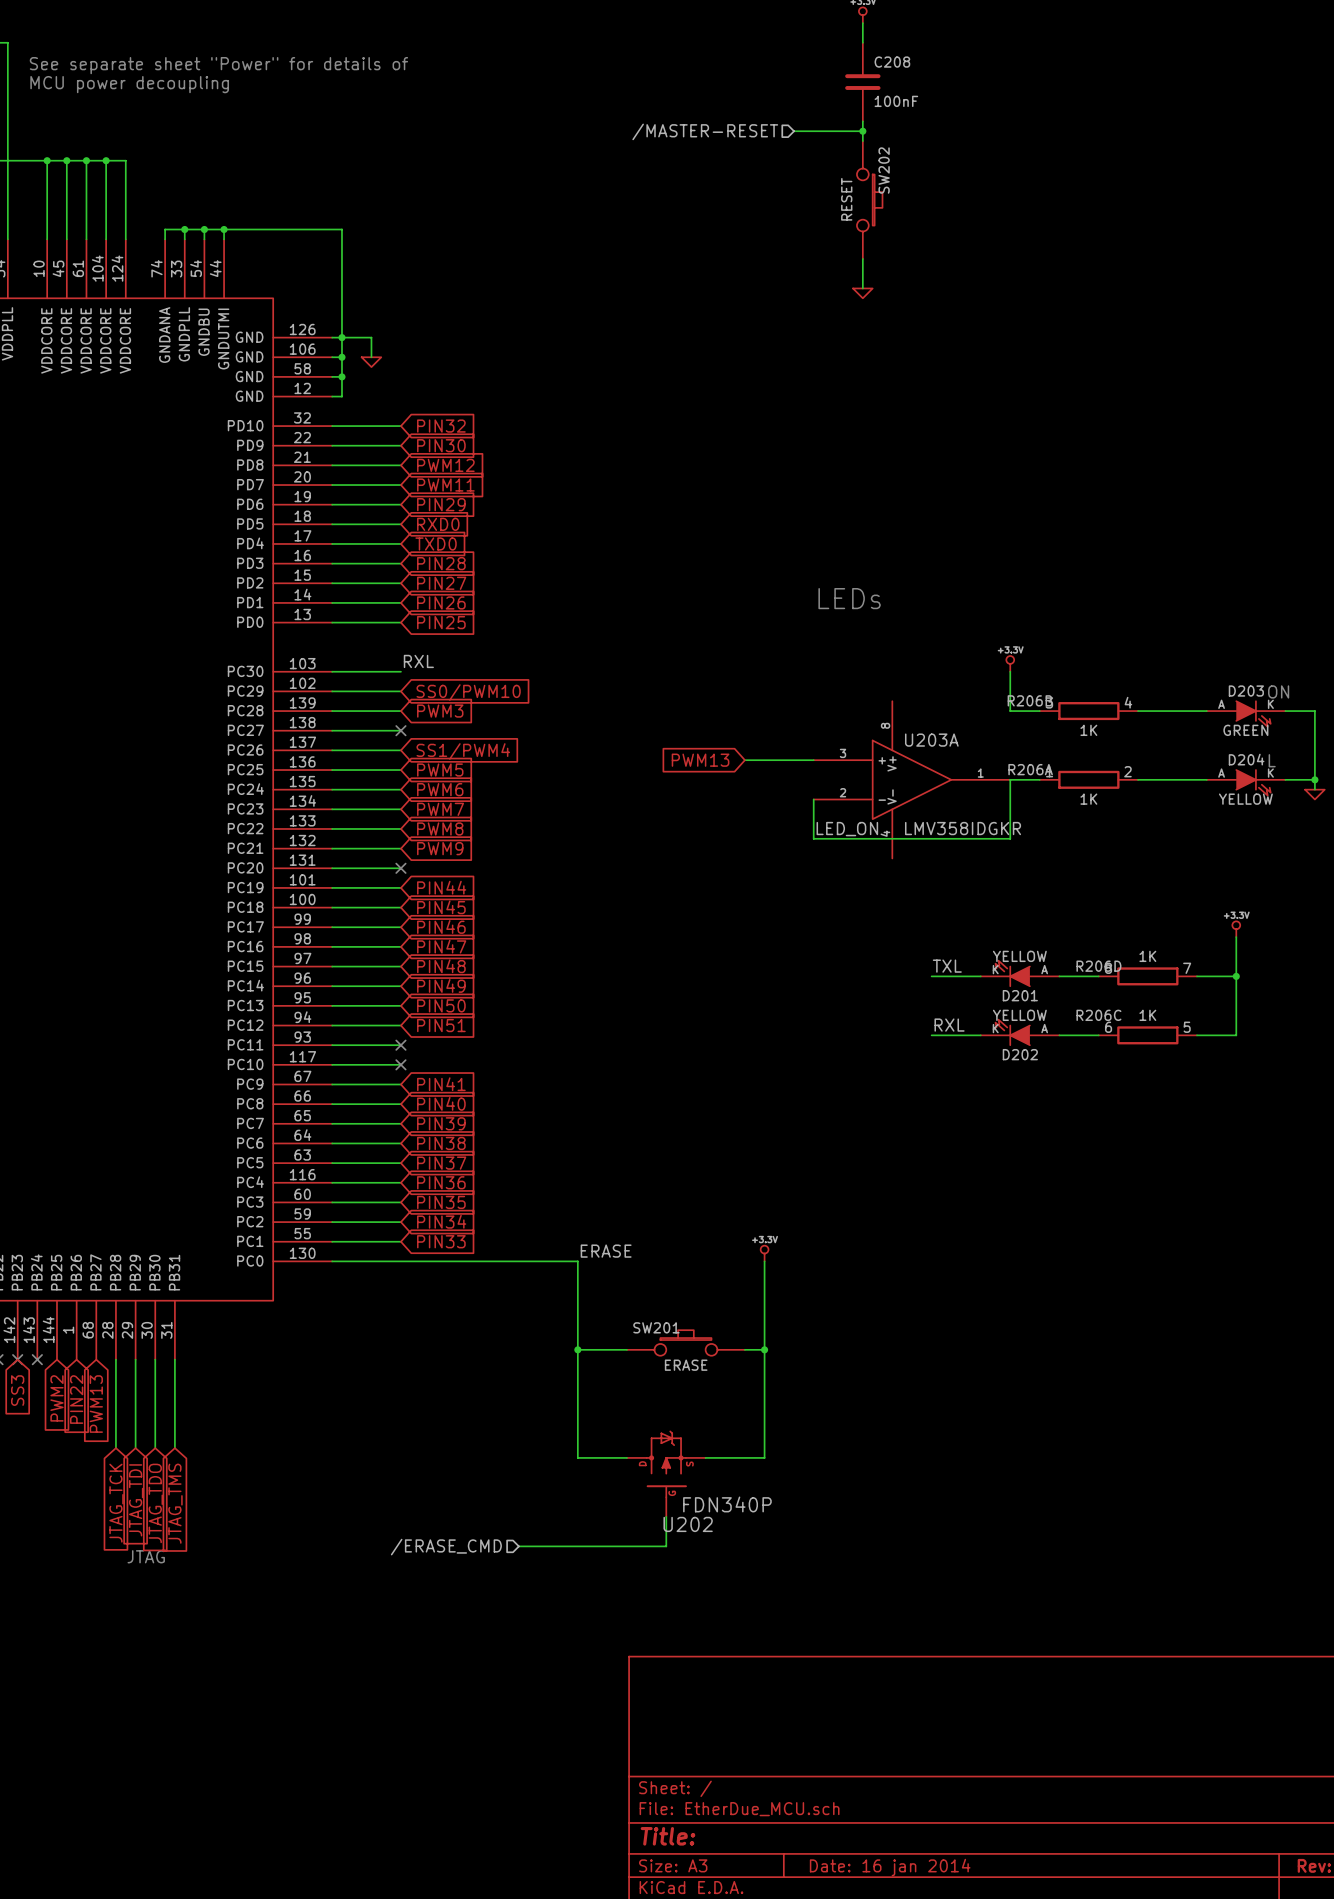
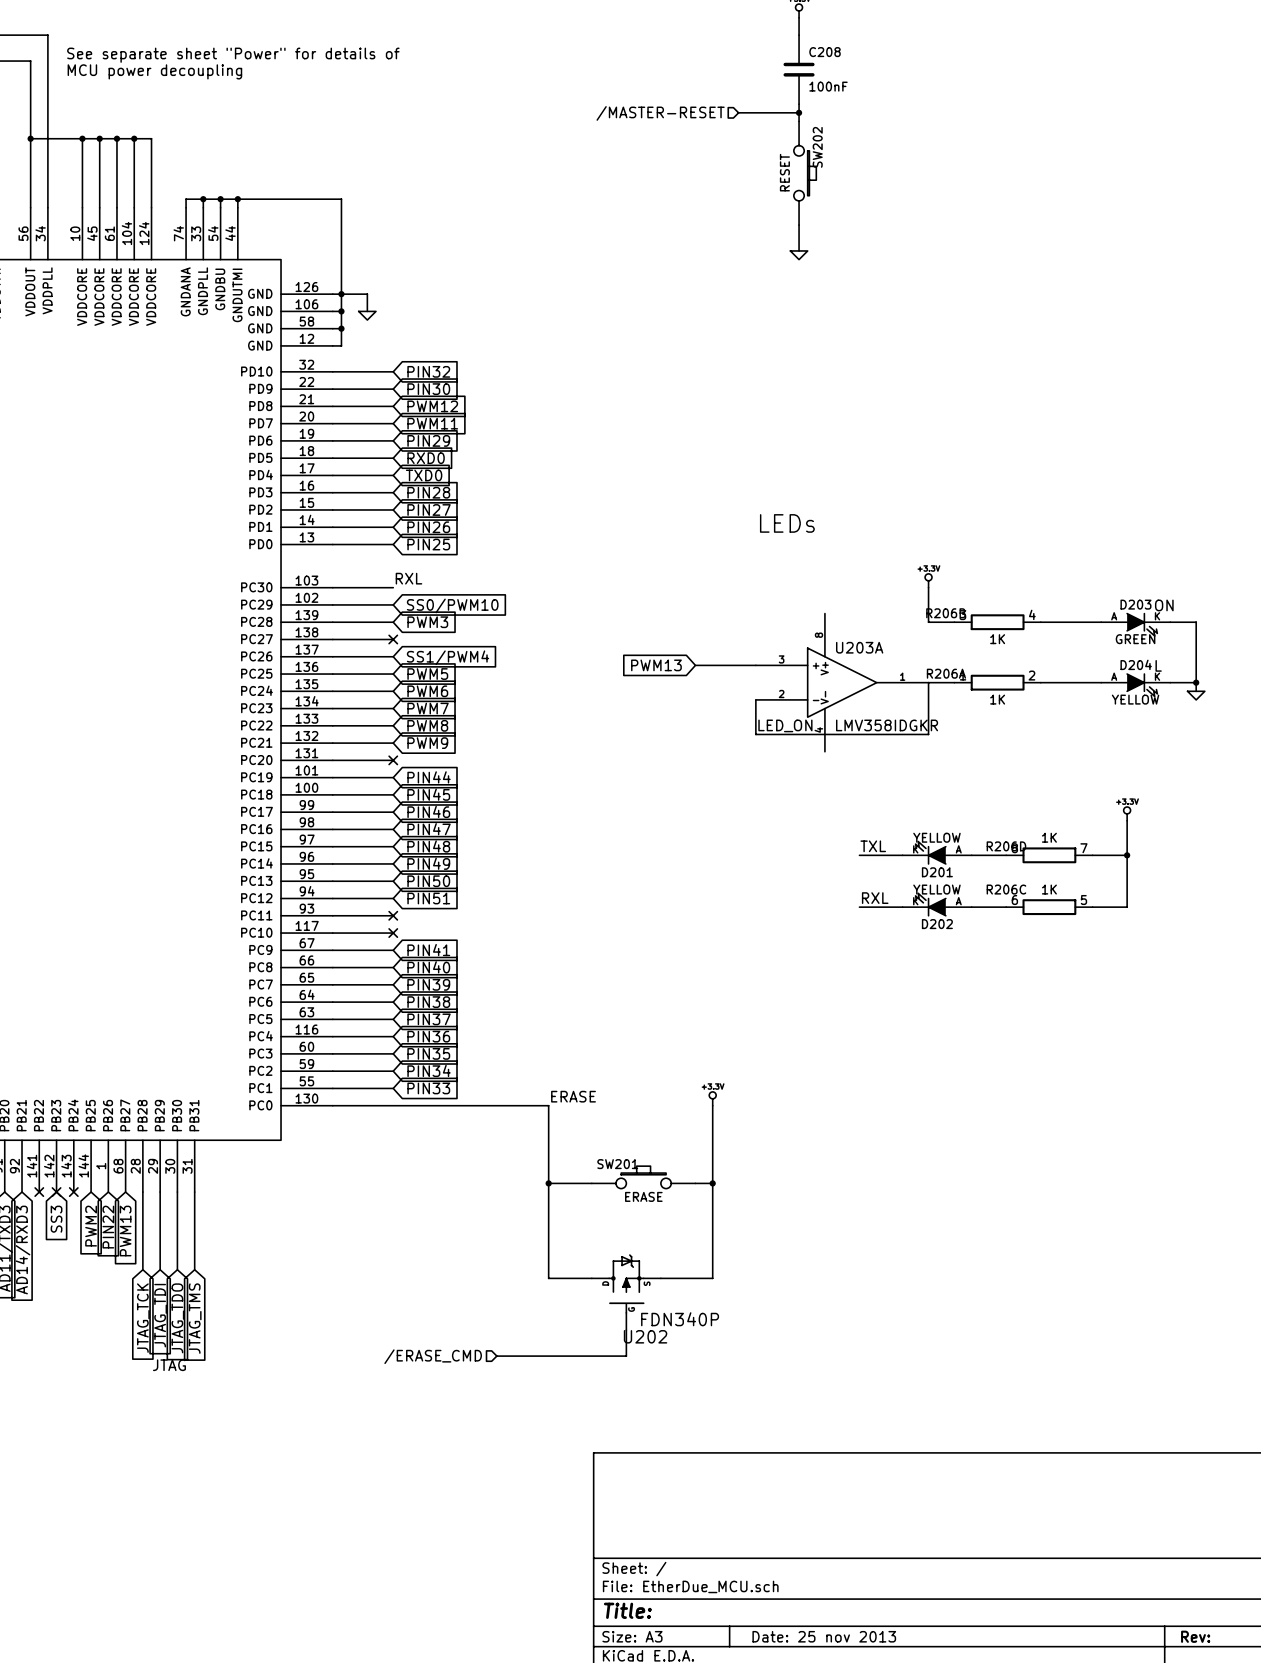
title block: Date: 16 jan 2014 (890, 1867) -> Date: 25 nov 2013 (824, 1636)

